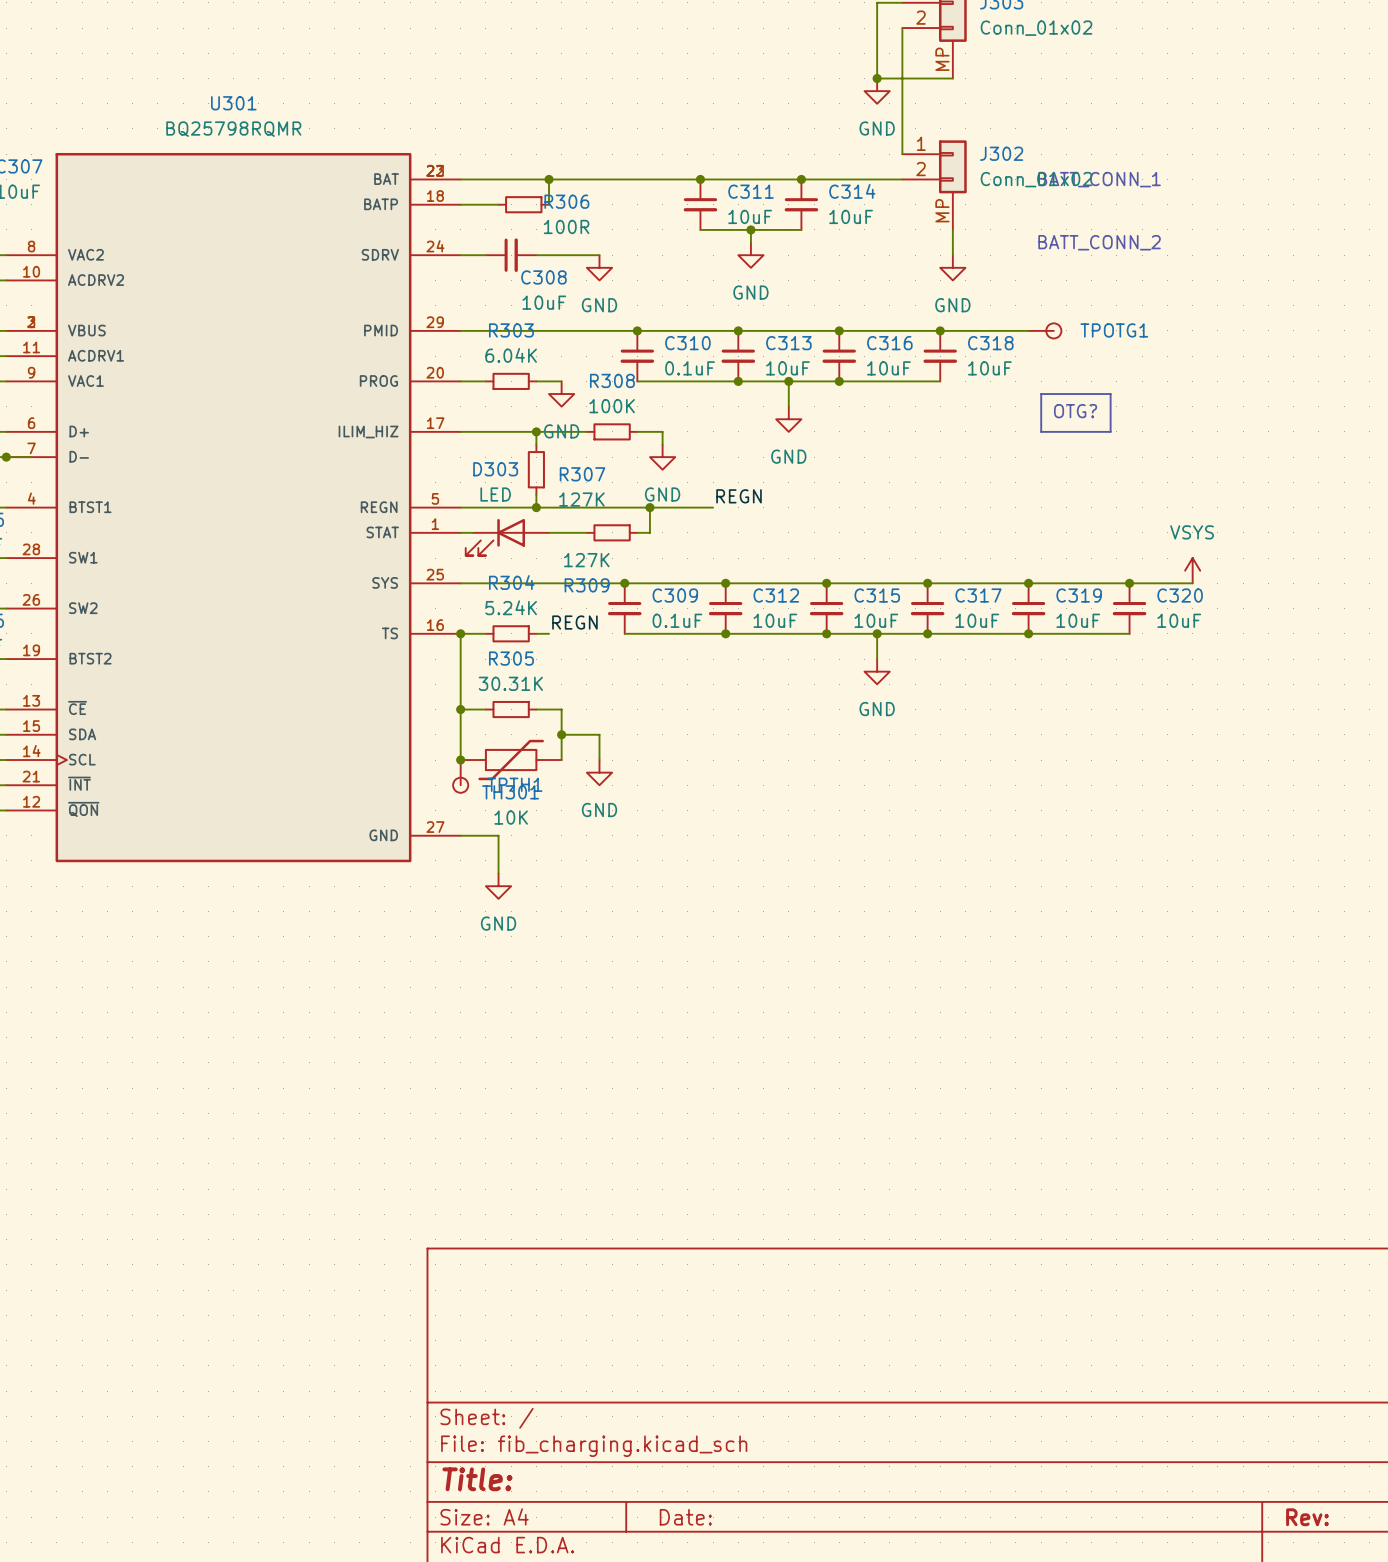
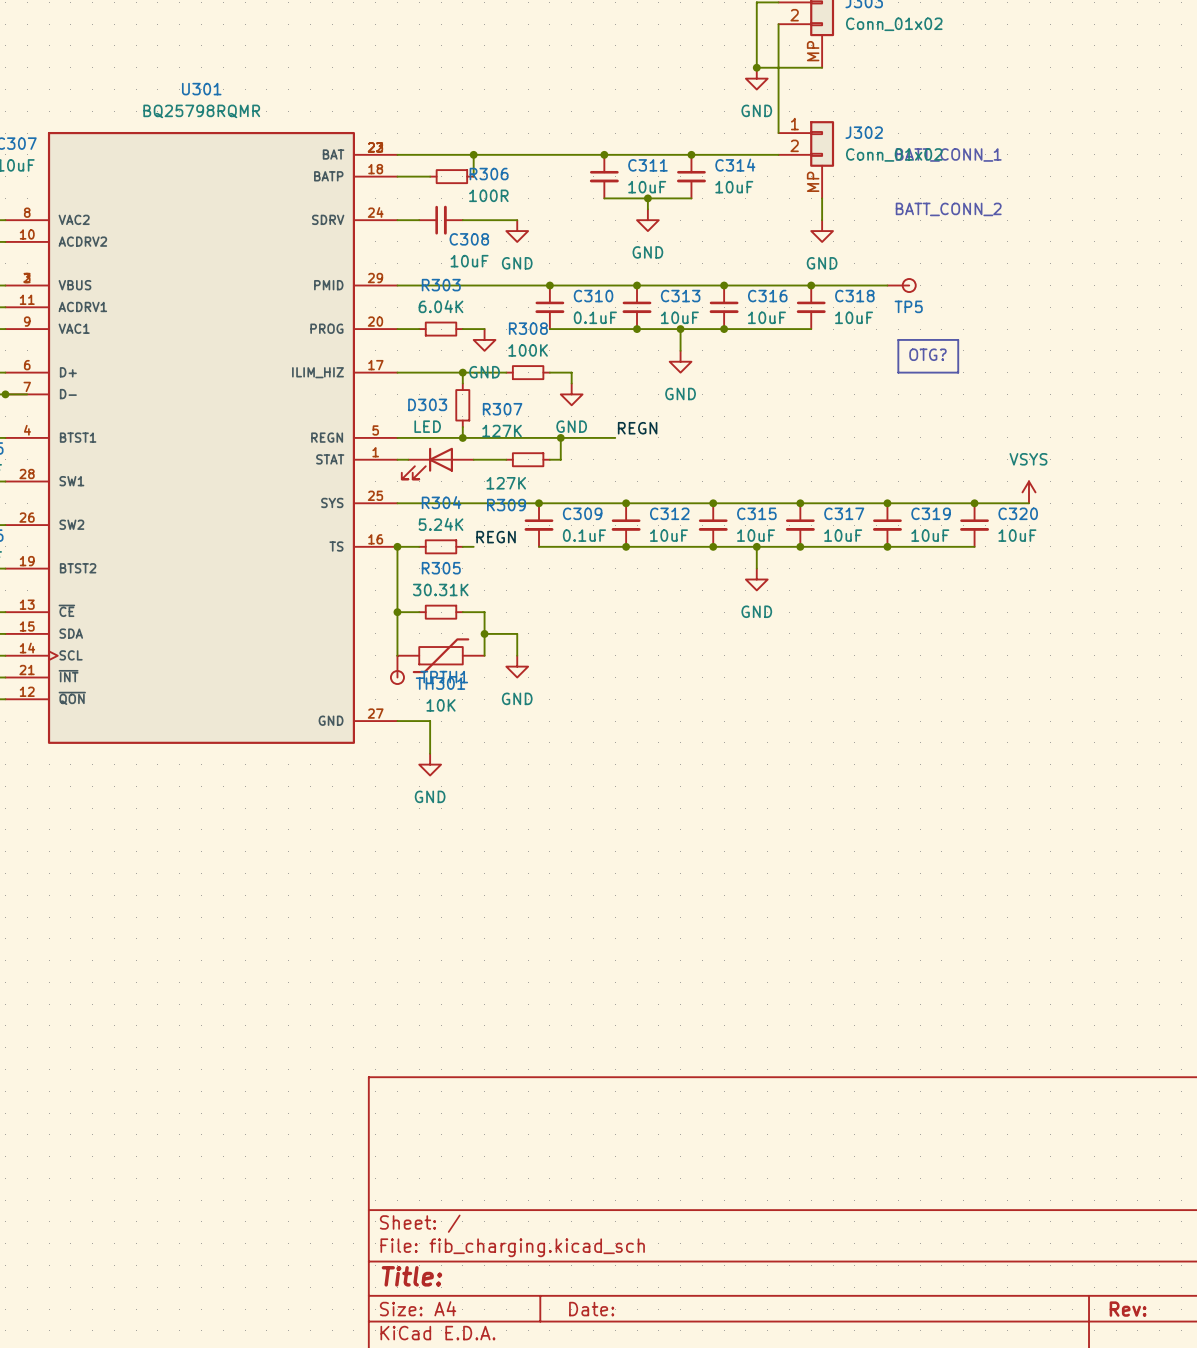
TPOTG1 name: TPOTG1 (1114, 330) -> TP5 (908, 306)
junction: (460, 760) -> none

